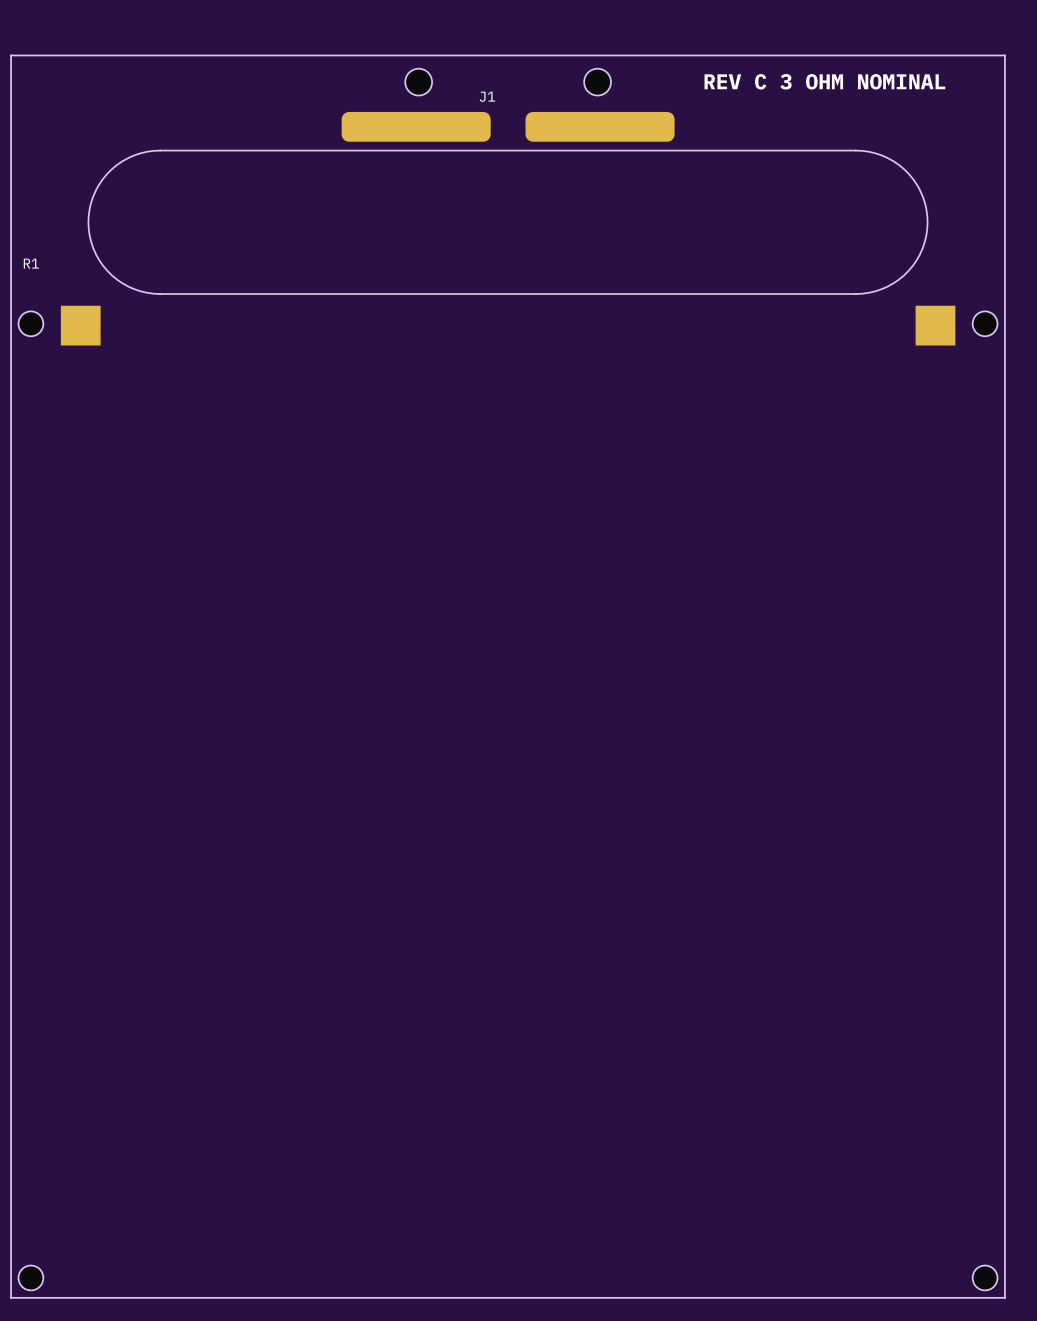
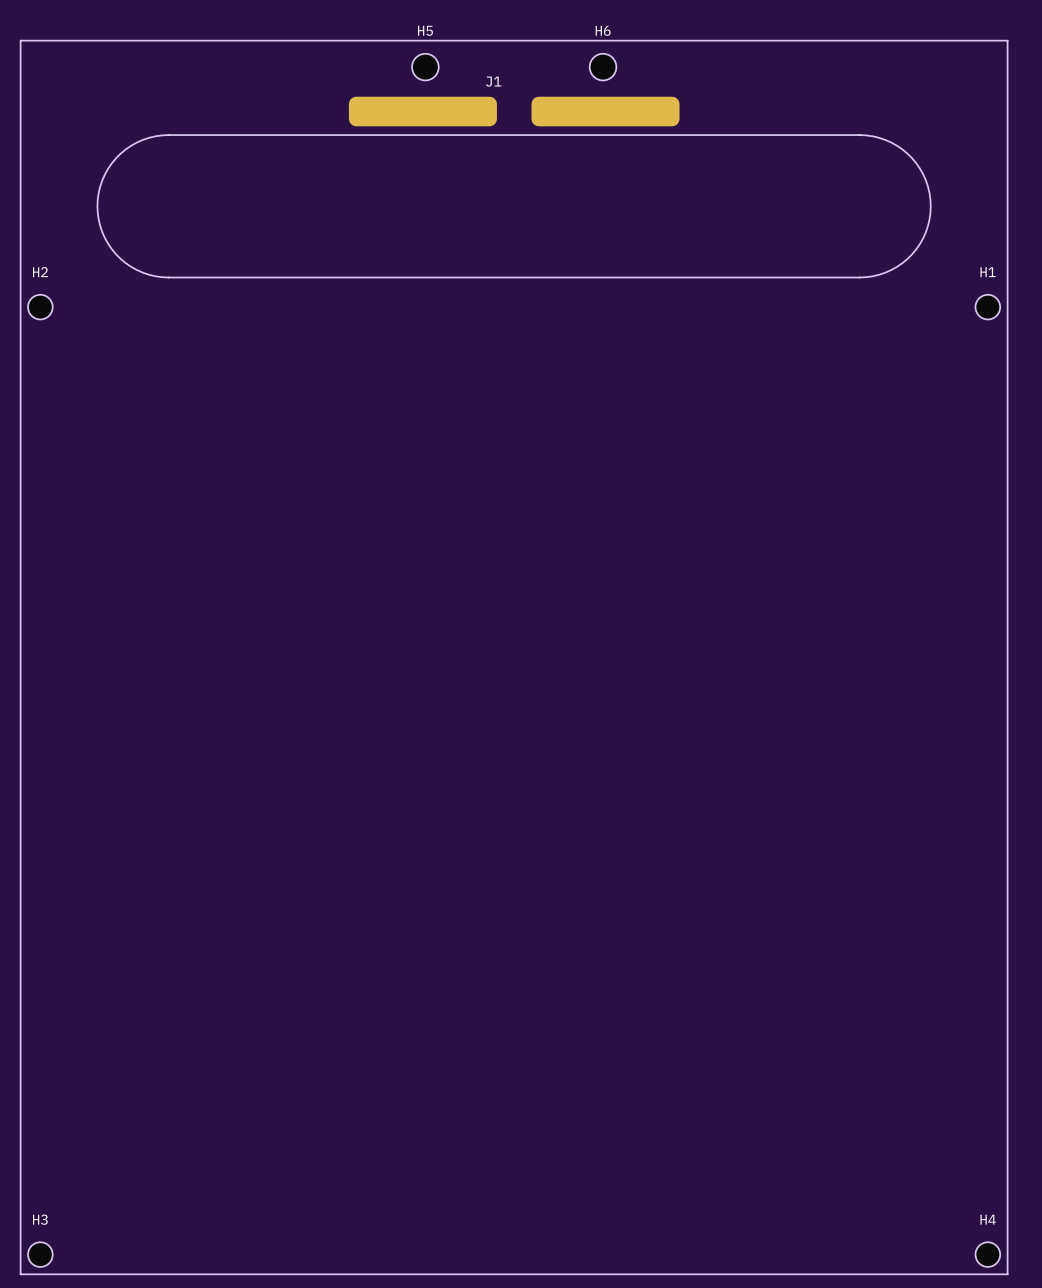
H5 name: none -> H5 (425, 30)
H6 name: none -> H6 (603, 30)
text: REV C 3 OHM NOMINAL (824, 81) -> none
H2 name: none -> H2 (40, 272)
H1 name: none -> H1 (988, 272)
R1: (508, 325) -> none
H3 name: none -> H3 (40, 1219)
H4 name: none -> H4 (988, 1219)

